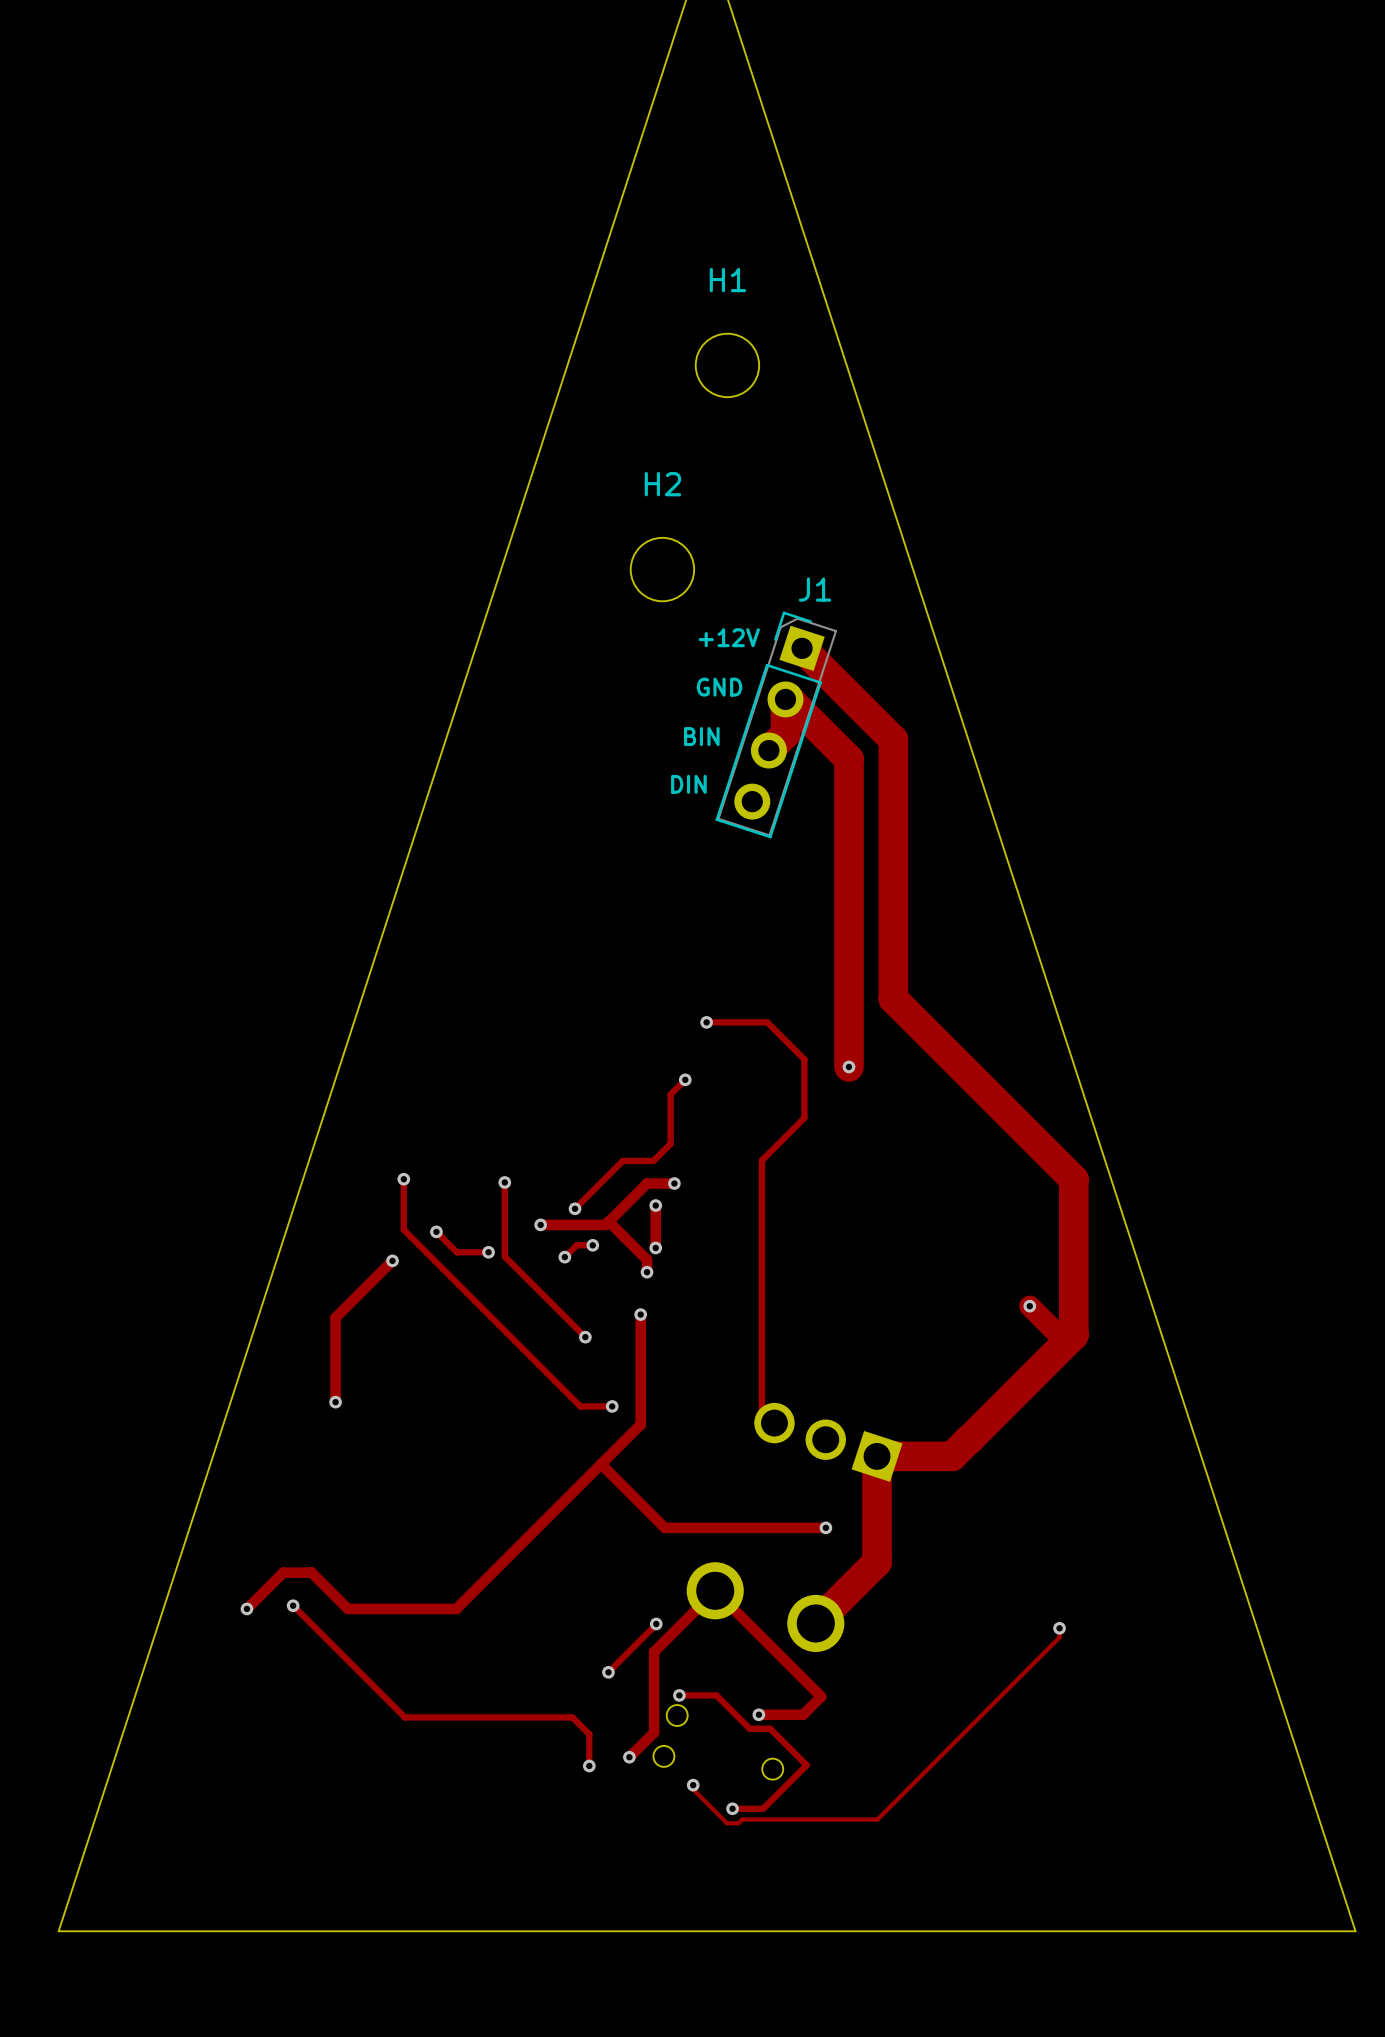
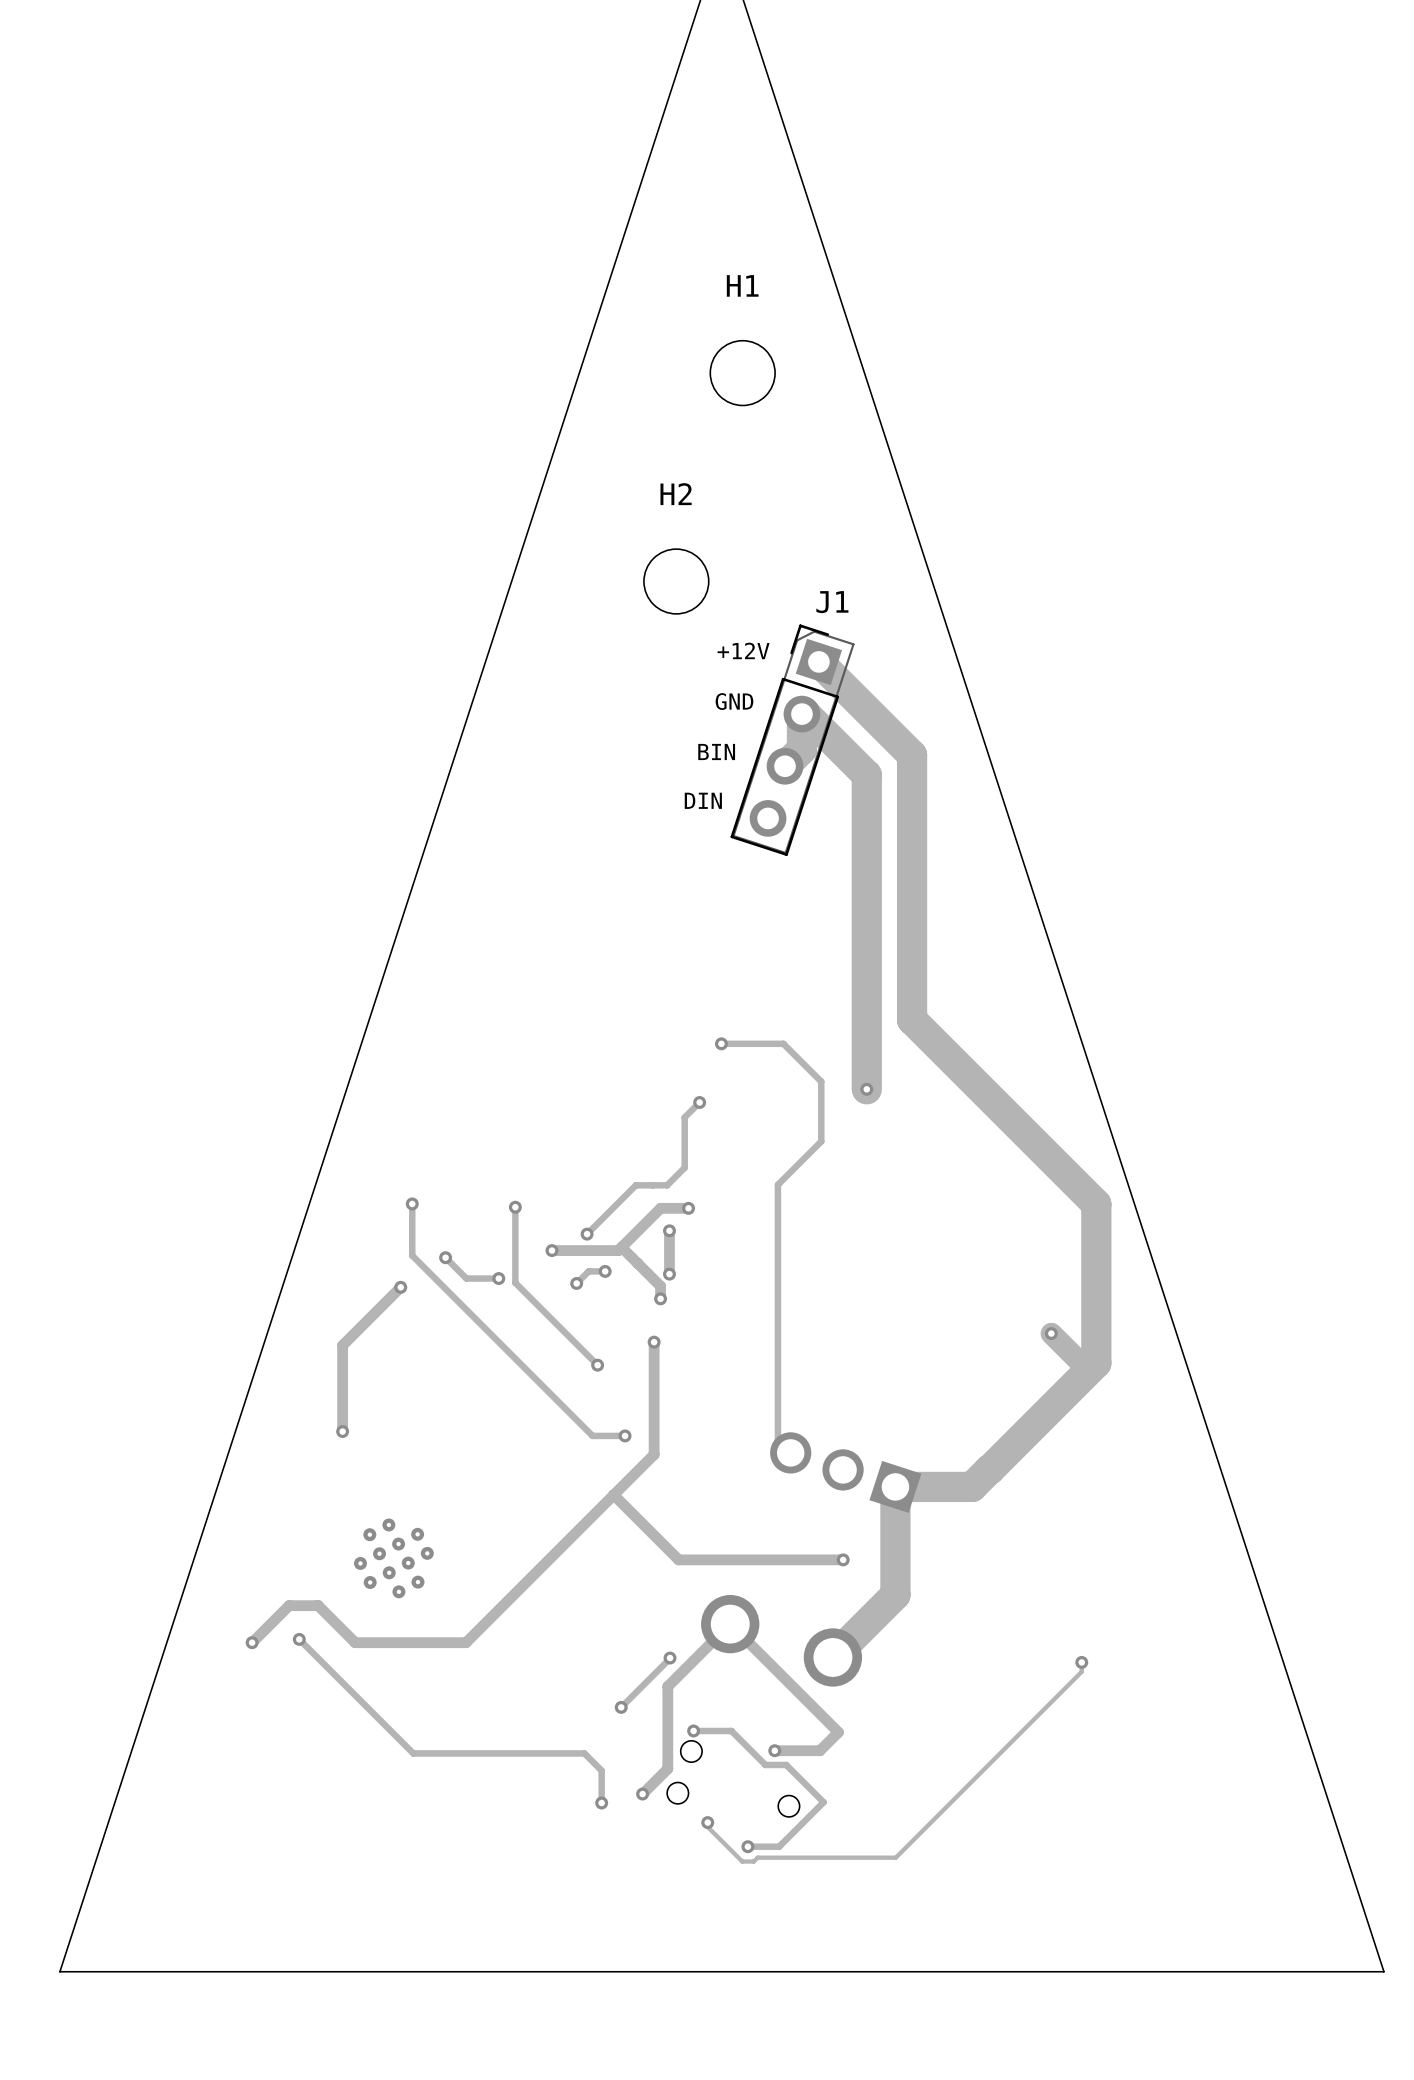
part: none -> (393, 1558)

